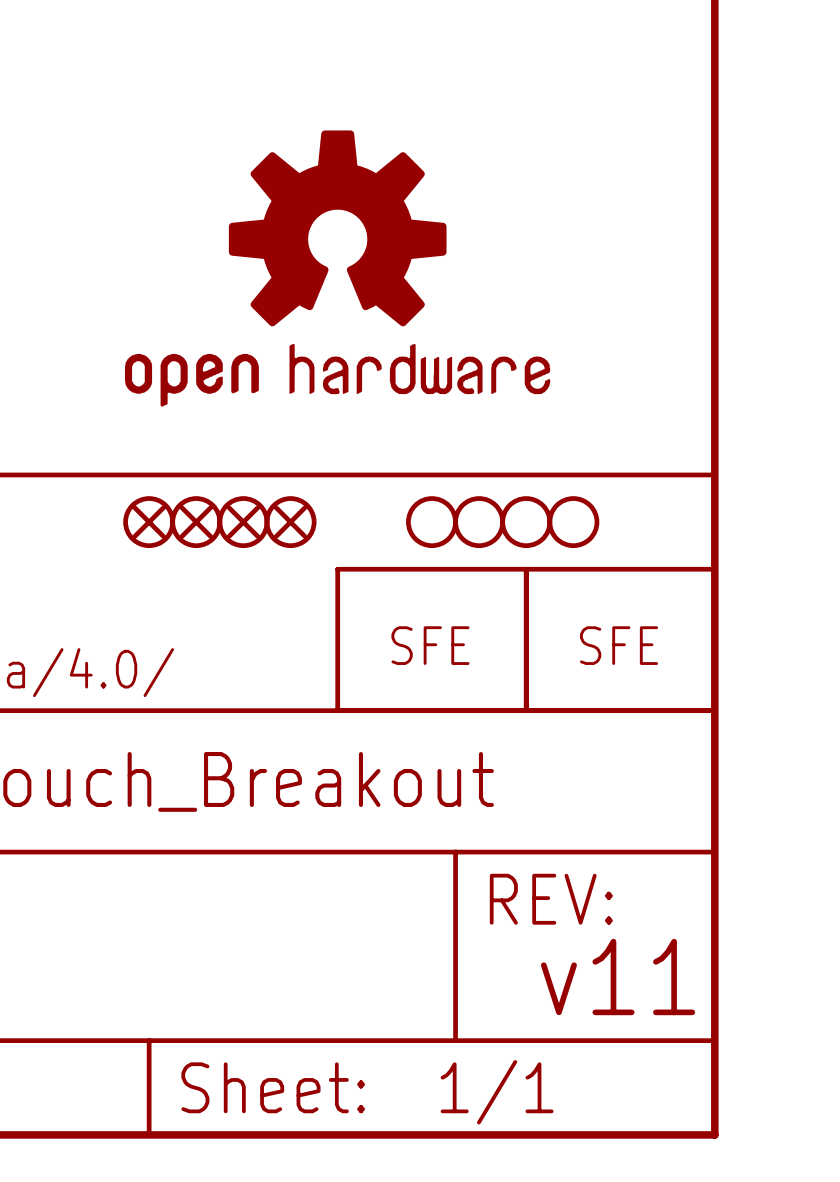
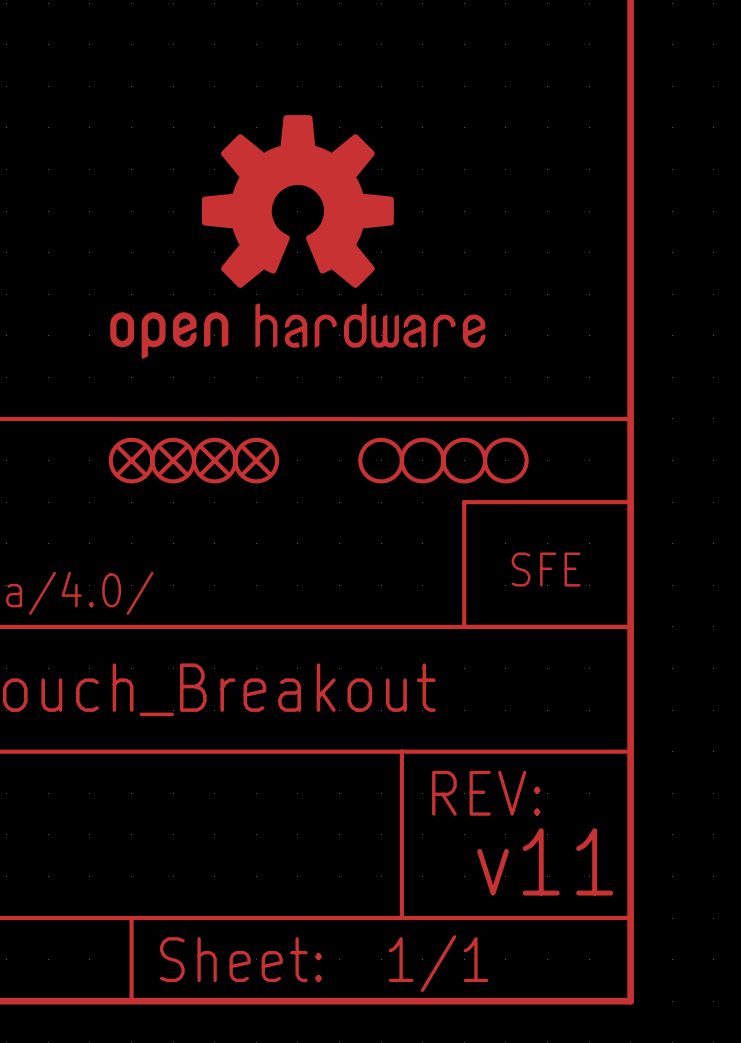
part: (431, 639) -> none

